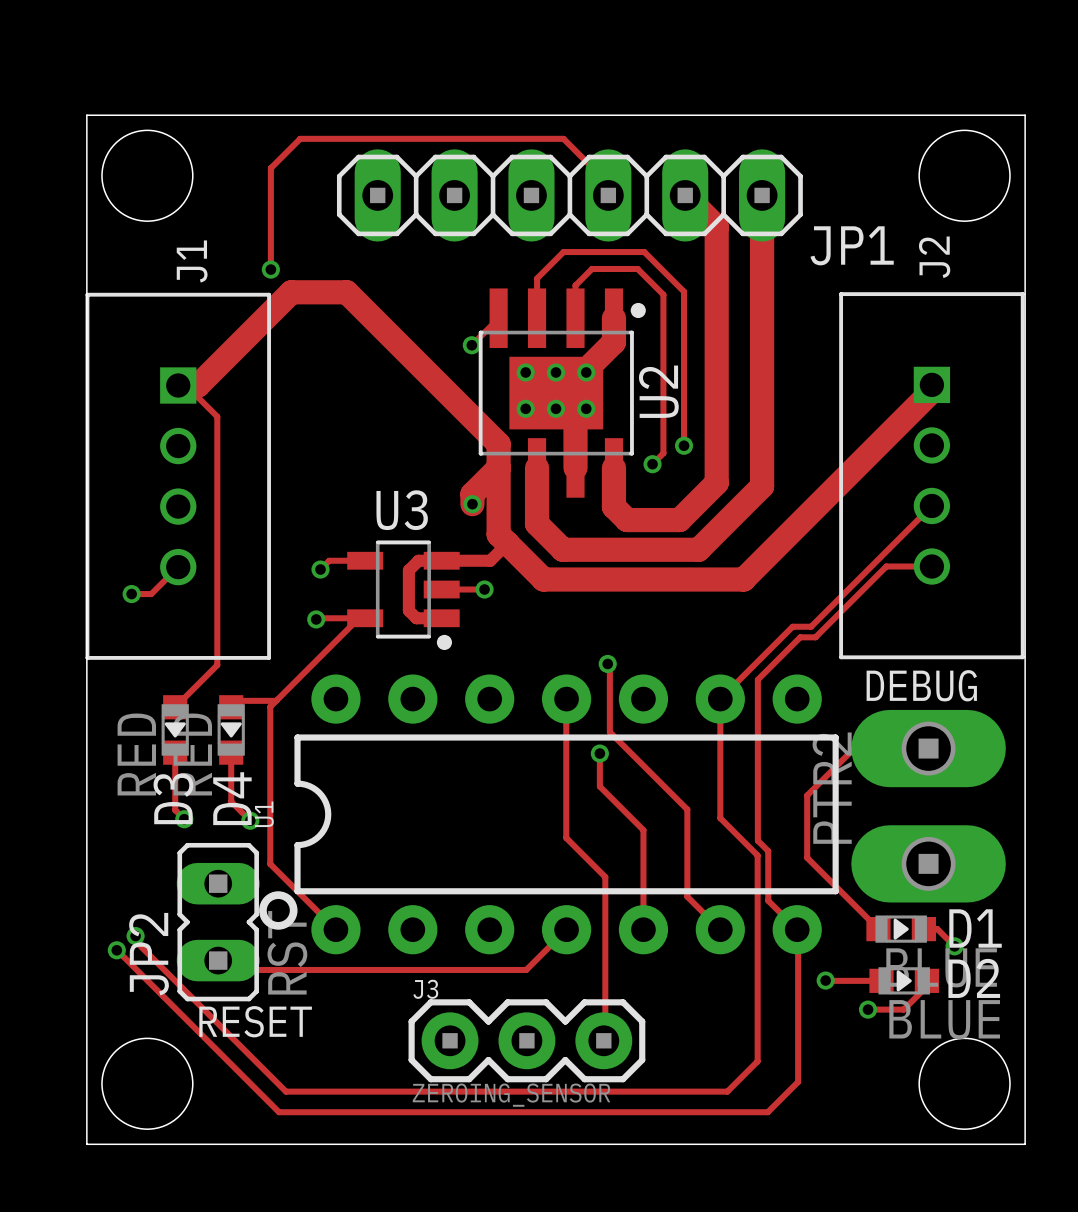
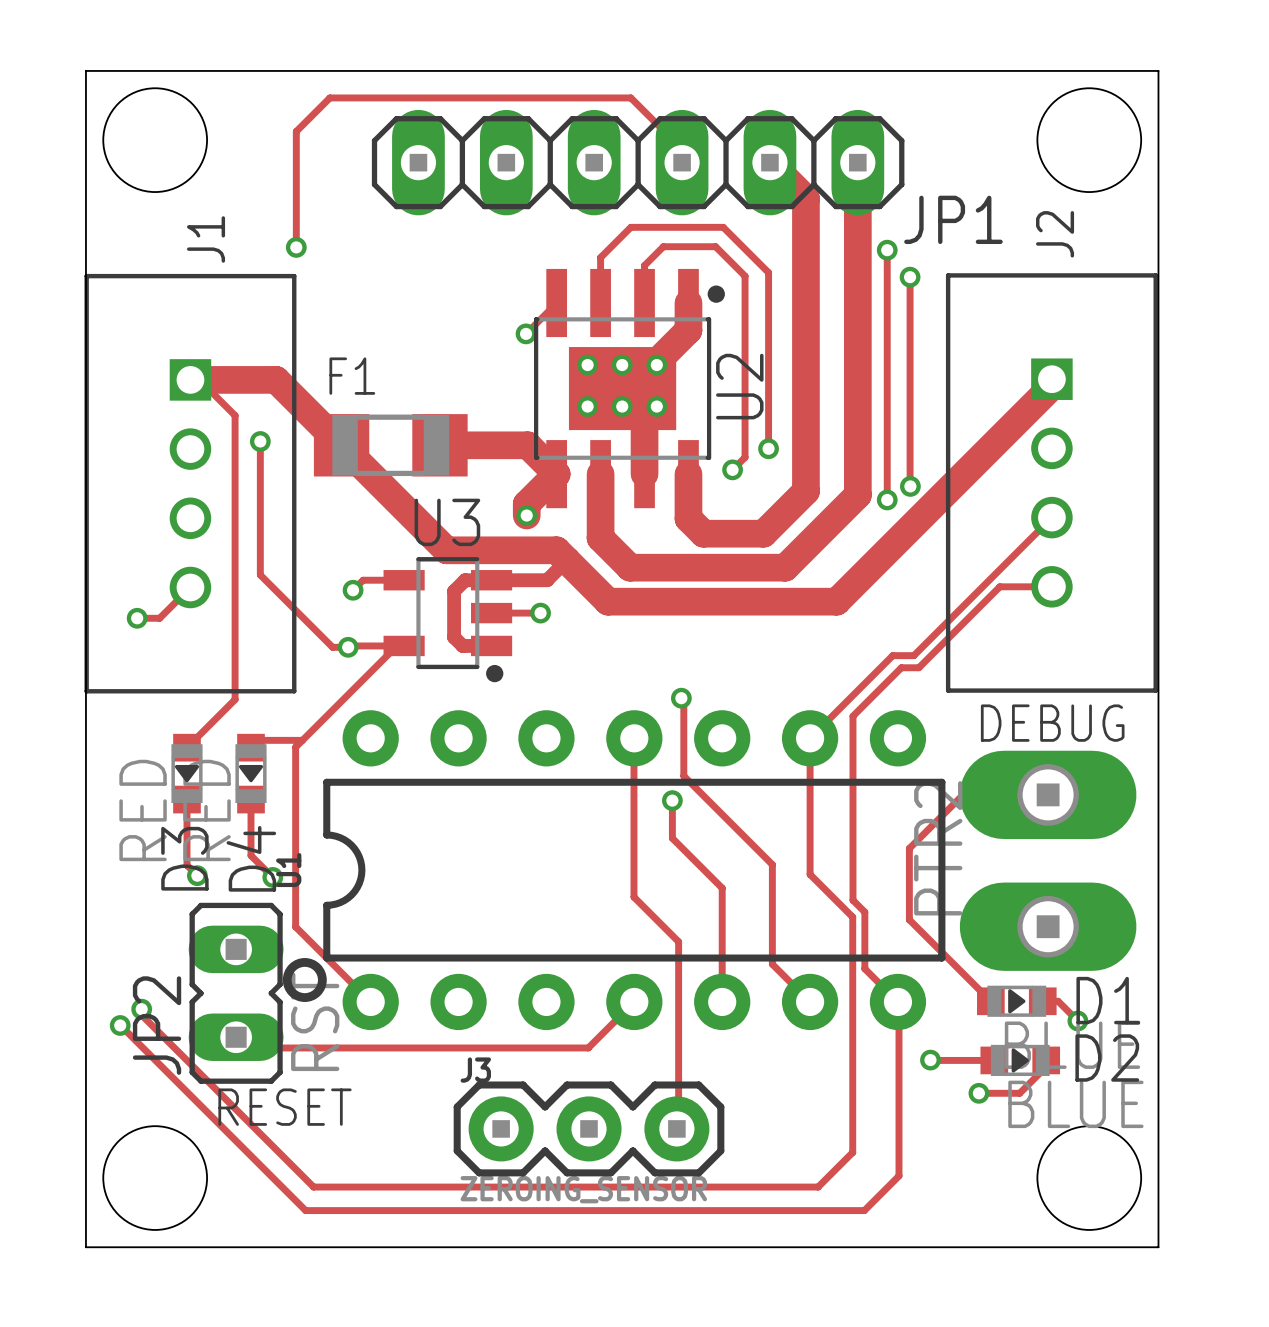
track: none -> (887, 250) (887, 499)
via: none -> (887, 250)
track: none -> (910, 277) (910, 486)
via: none -> (910, 277)
track: (198, 385) (291, 292) (346, 292) (498, 444) (498, 534) -> (213, 379) (276, 379) (446, 550) (556, 550)
track: none -> (260, 441) (260, 575) (332, 647) (348, 647)
via: none -> (260, 441)
F1: none -> (390, 445)
track: none -> (439, 445) (527, 445) (556, 474)
via: none -> (910, 486)
via: none -> (887, 499)

